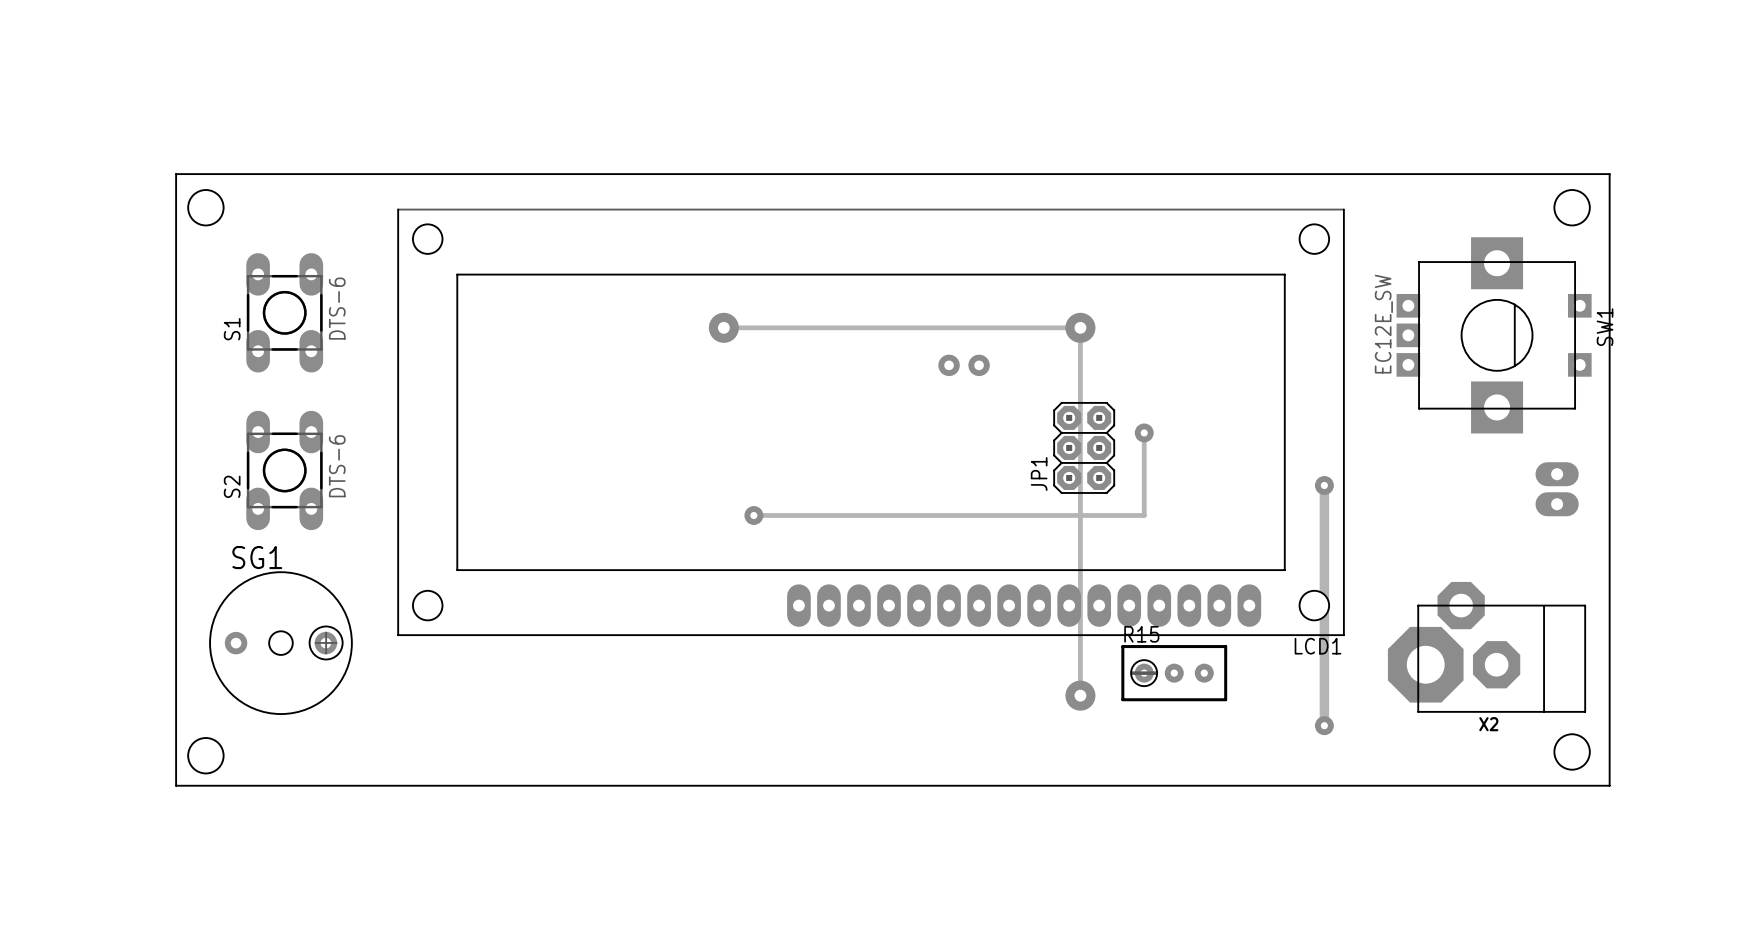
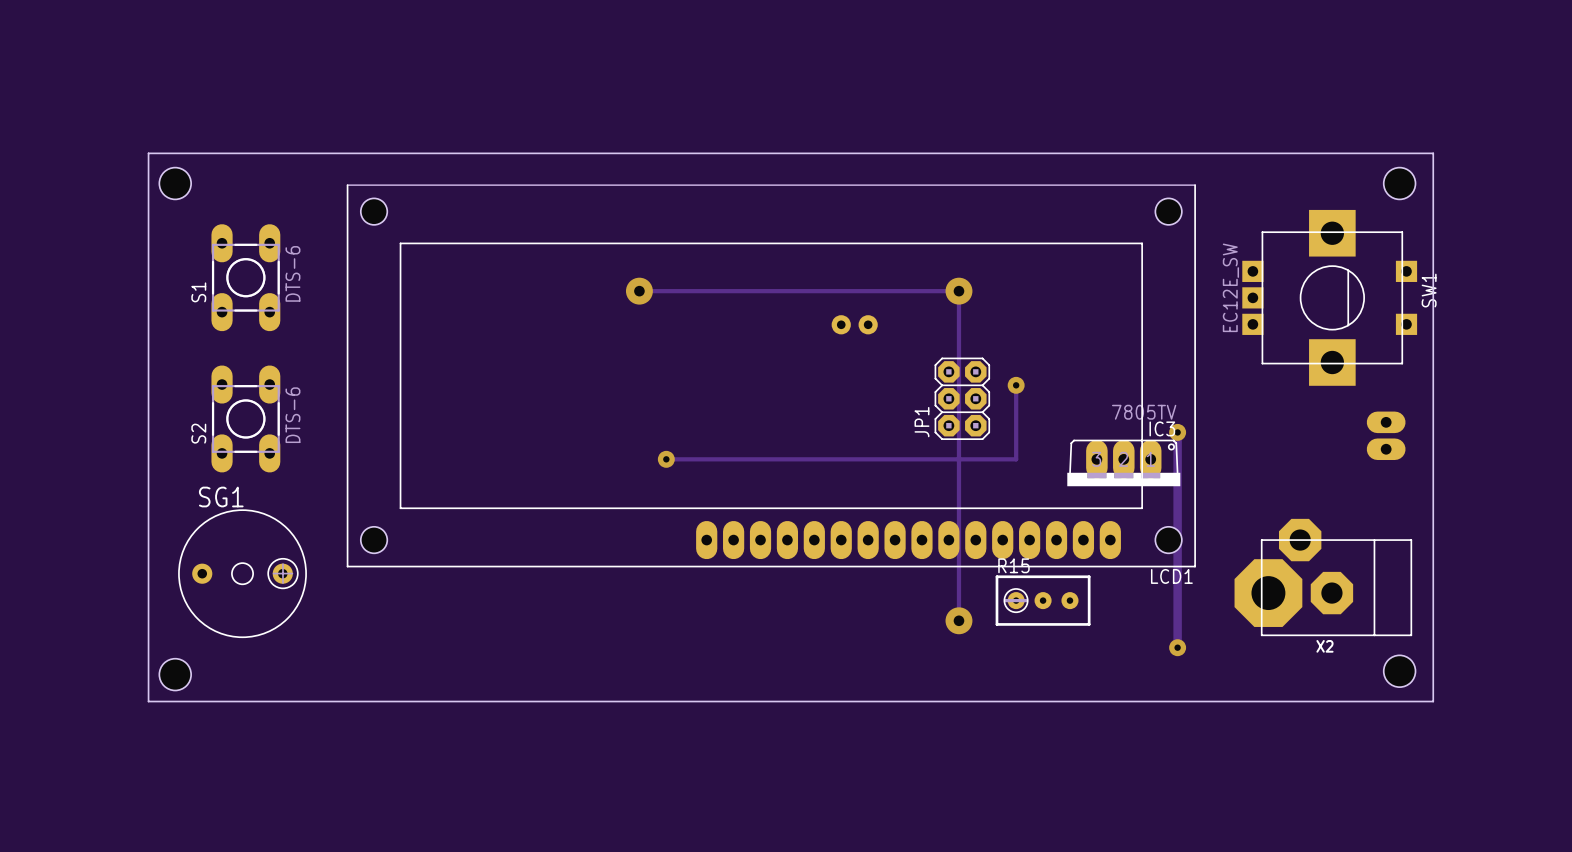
IC3: none -> 7805TV (1123, 463)

